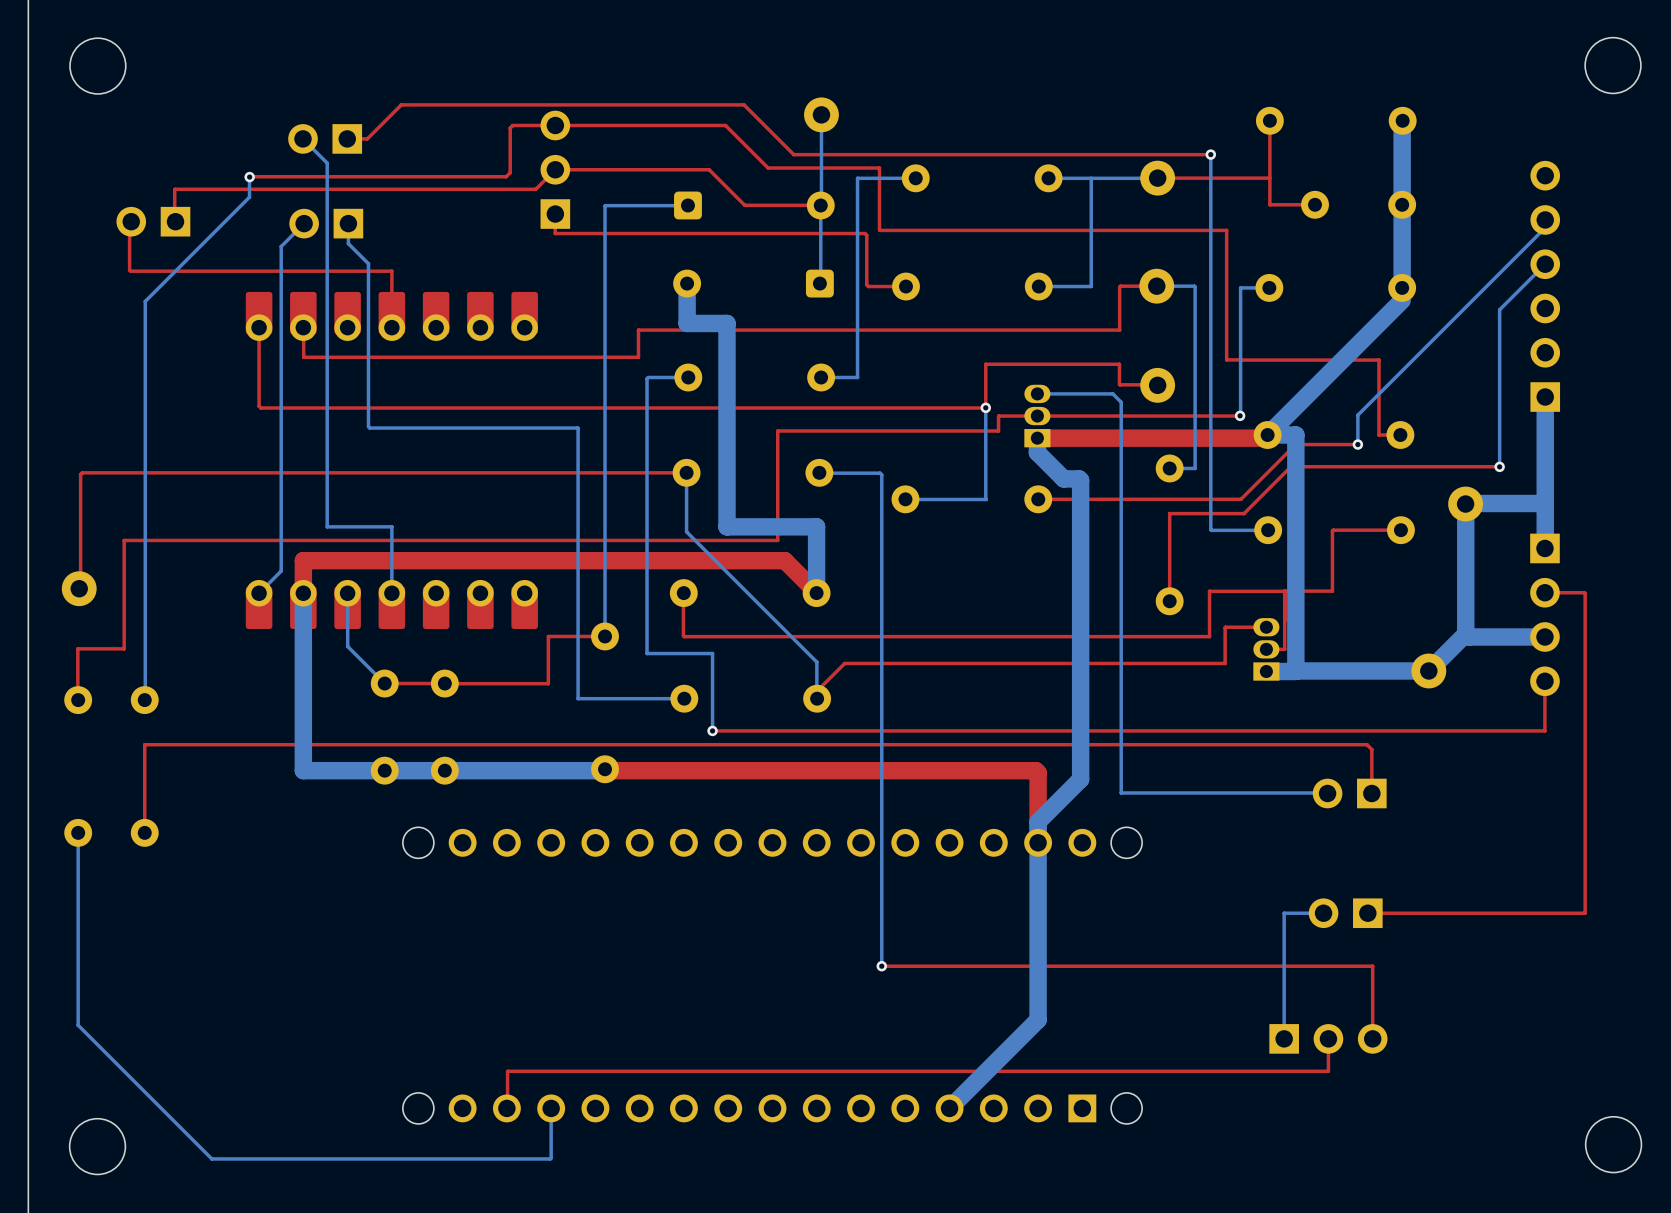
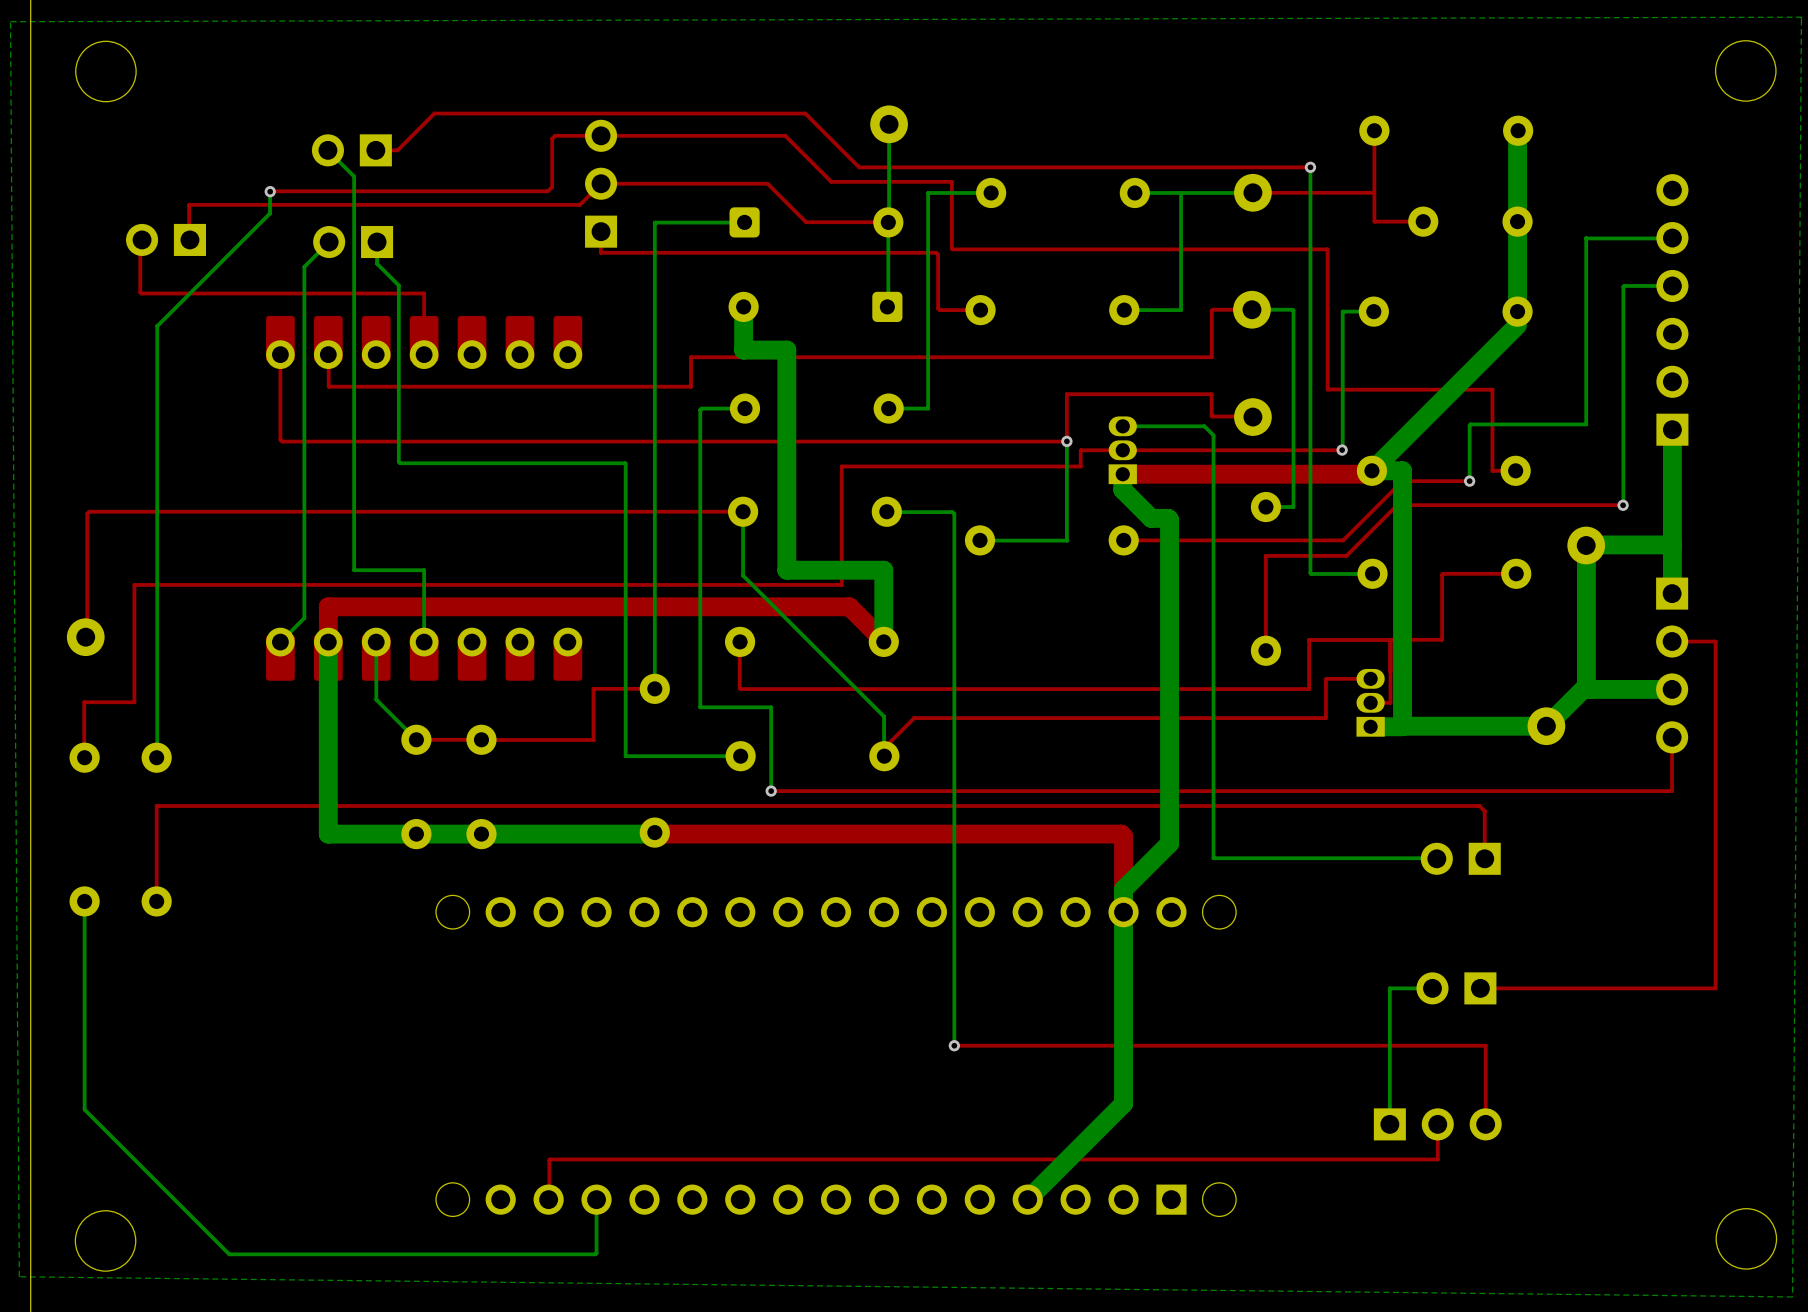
bottom zone outline: none -> (1801, 17) (10, 21) (19, 1276) (1792, 1296) (1801, 17)
bottom track: (1545, 219) (1542, 222) (1542, 230) (1357, 415) -> (1586, 238) (1586, 424) (1470, 424) (1469, 449)
bottom track: none -> (1672, 238) (1586, 238)
bottom track: (1545, 264) (1499, 309) (1499, 466) -> (1672, 285) (1623, 286) (1623, 505)

